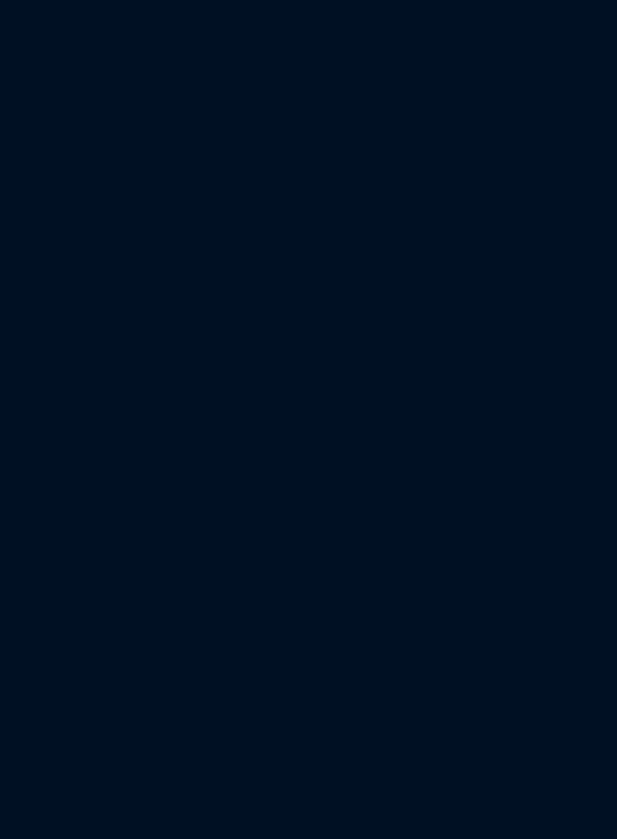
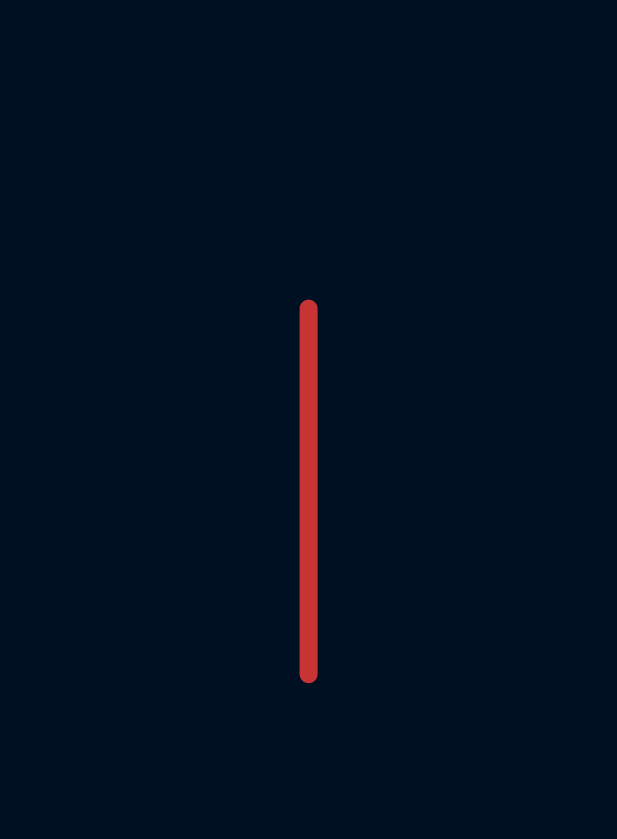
top track: none -> (308, 308) (308, 674)

